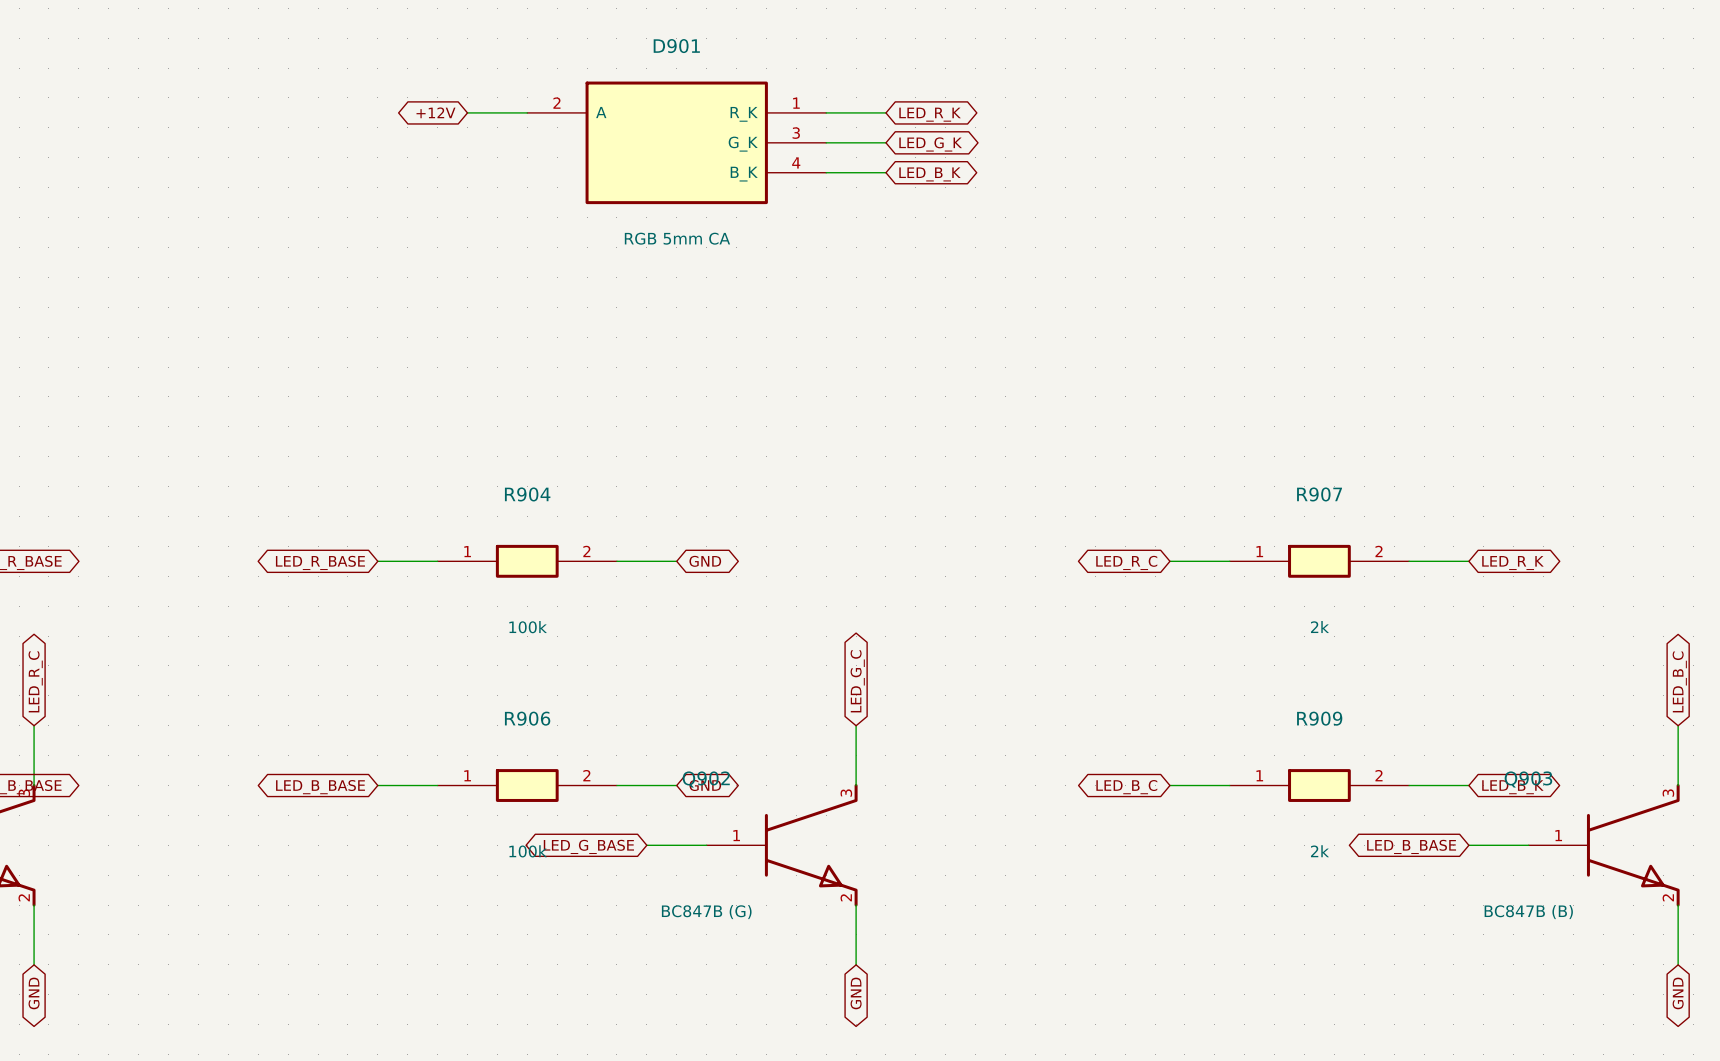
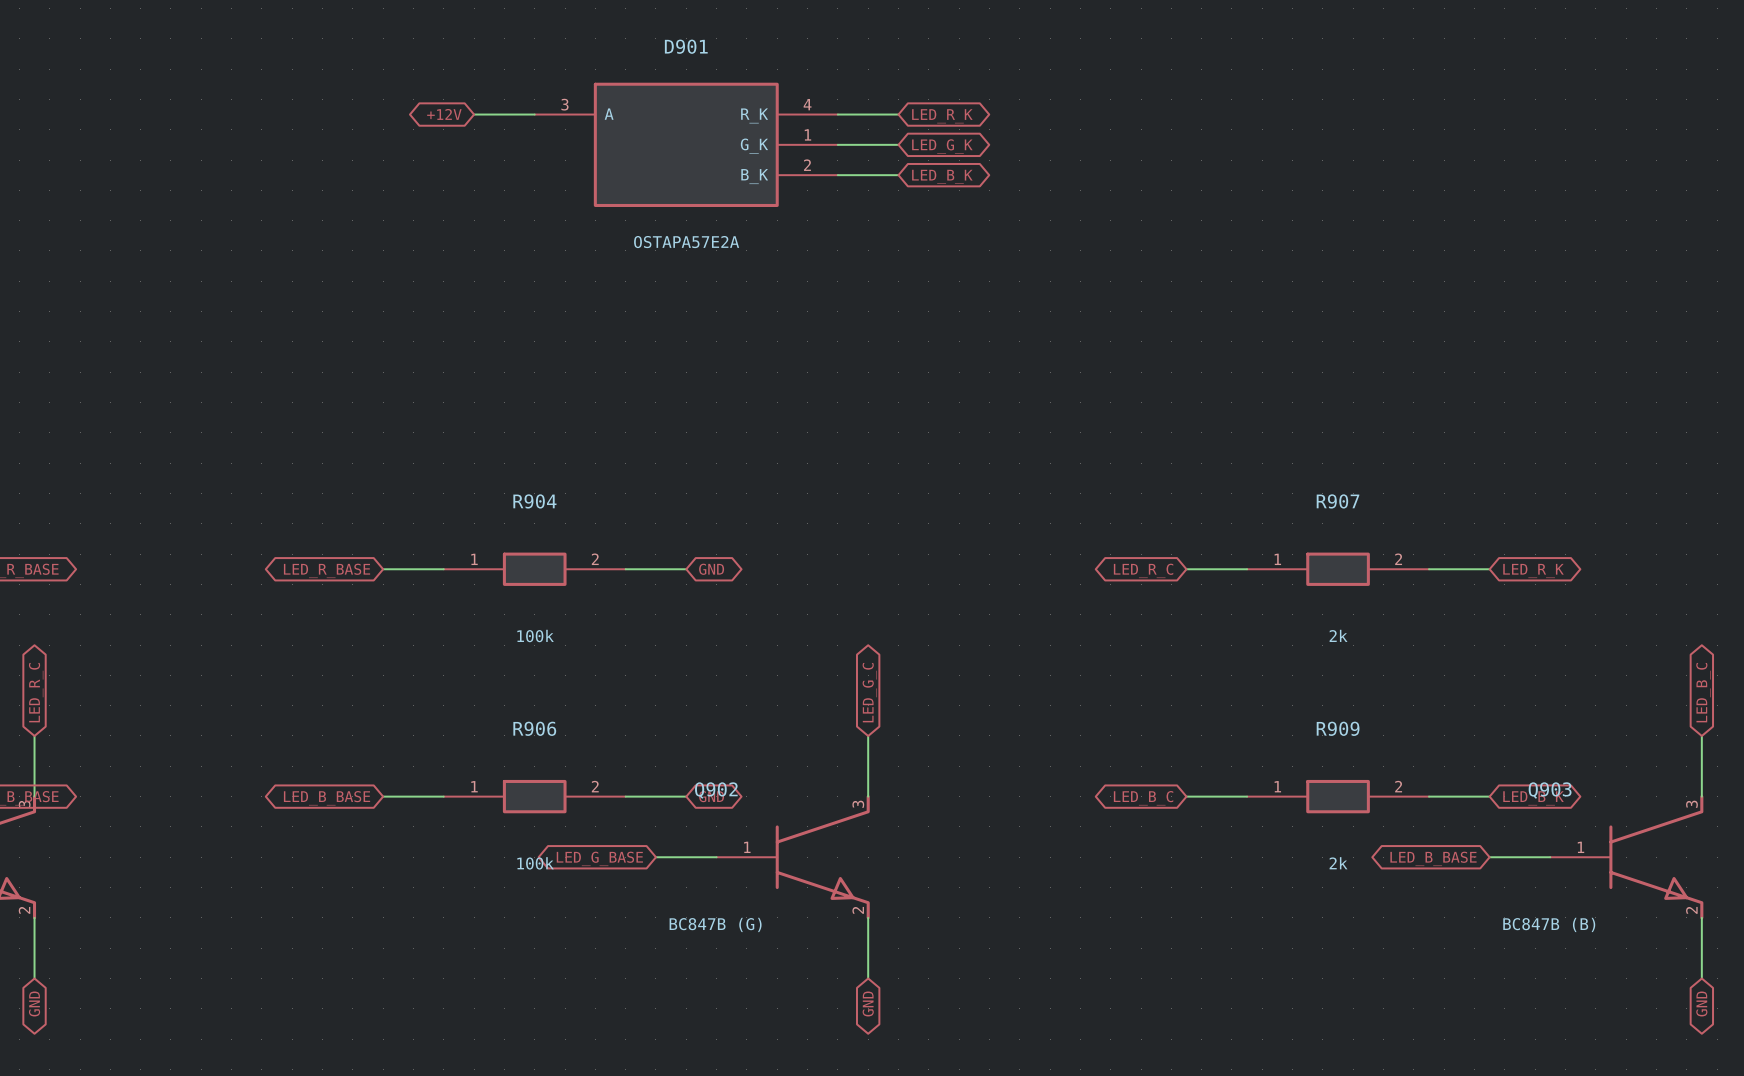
D901 pin number: 2 (556, 103) -> 3 (564, 104)
D901 pin number: 1 (796, 103) -> 4 (807, 104)
D901 pin number: 3 (796, 133) -> 1 (807, 134)
D901 pin number: 4 (796, 162) -> 2 (807, 165)
D901 value: RGB 5mm CA (677, 238) -> OSTAPA57E2A (686, 242)

